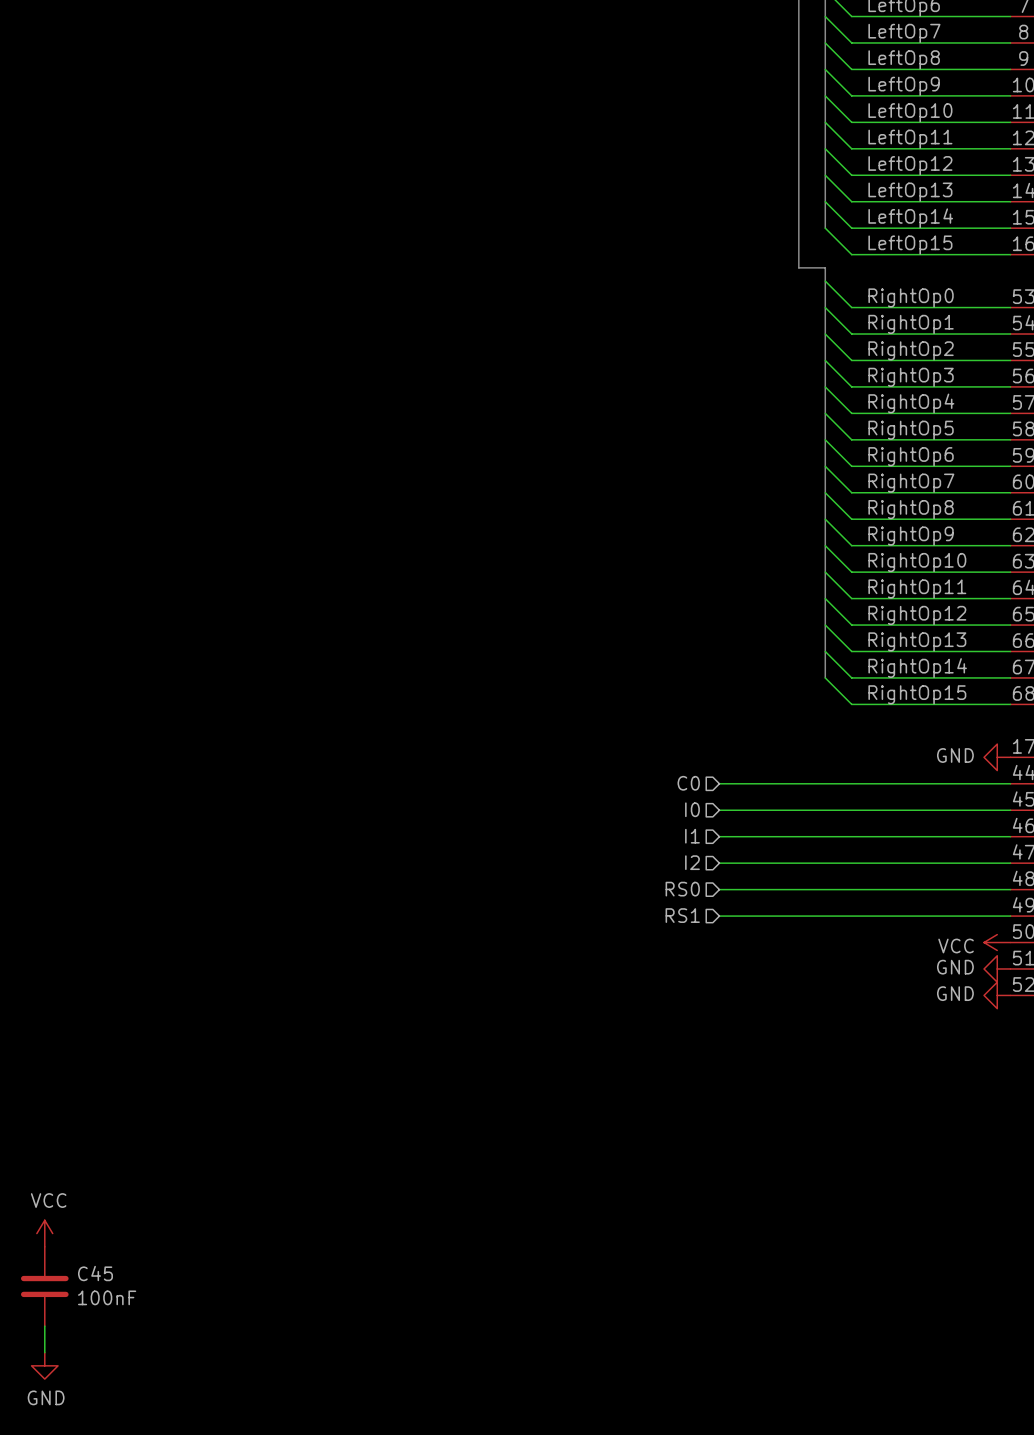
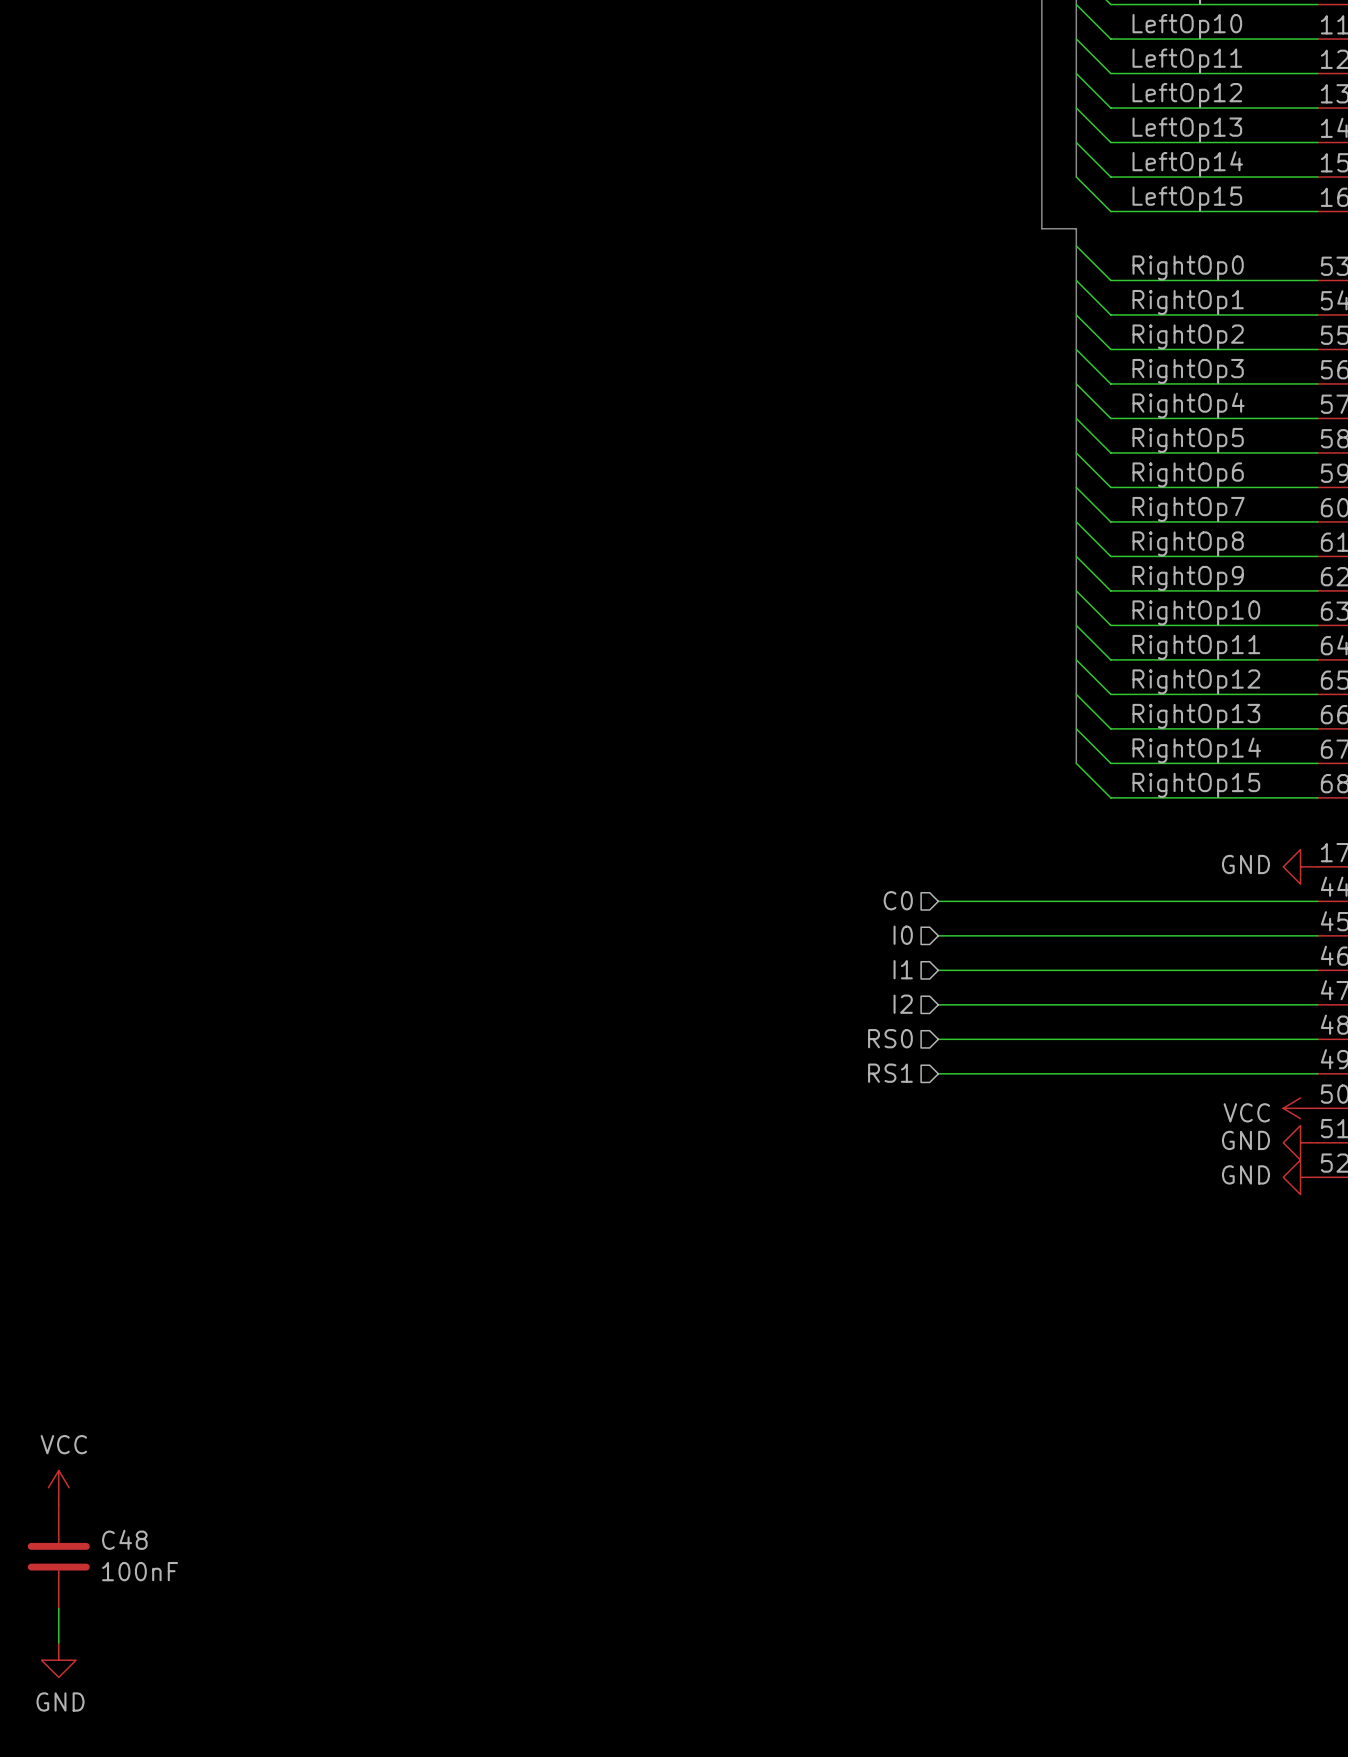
C45 name: C45 (95, 1273) -> C48 (124, 1539)

